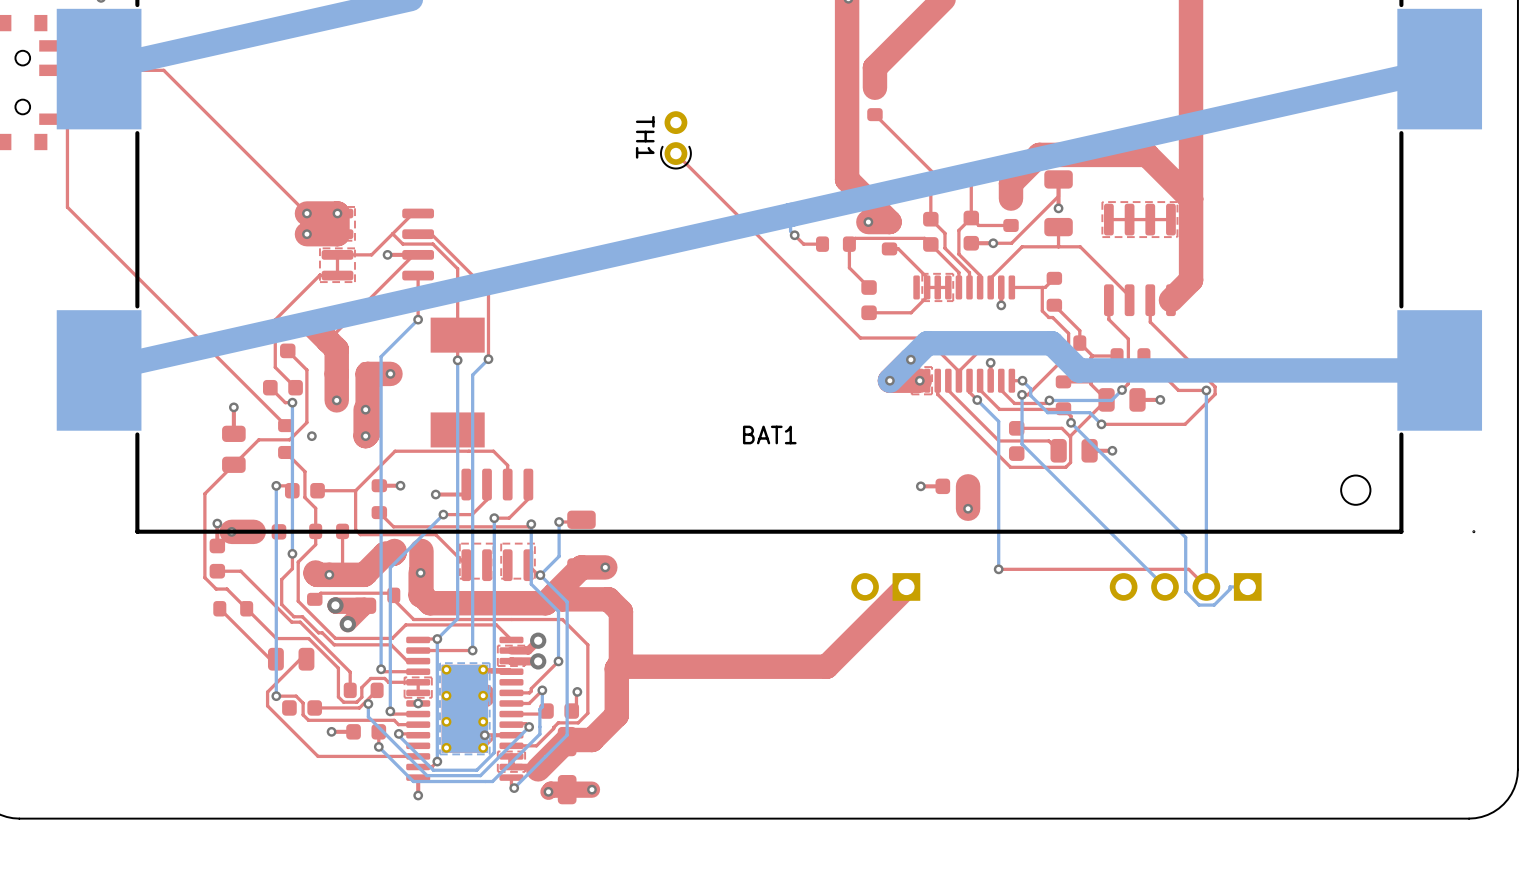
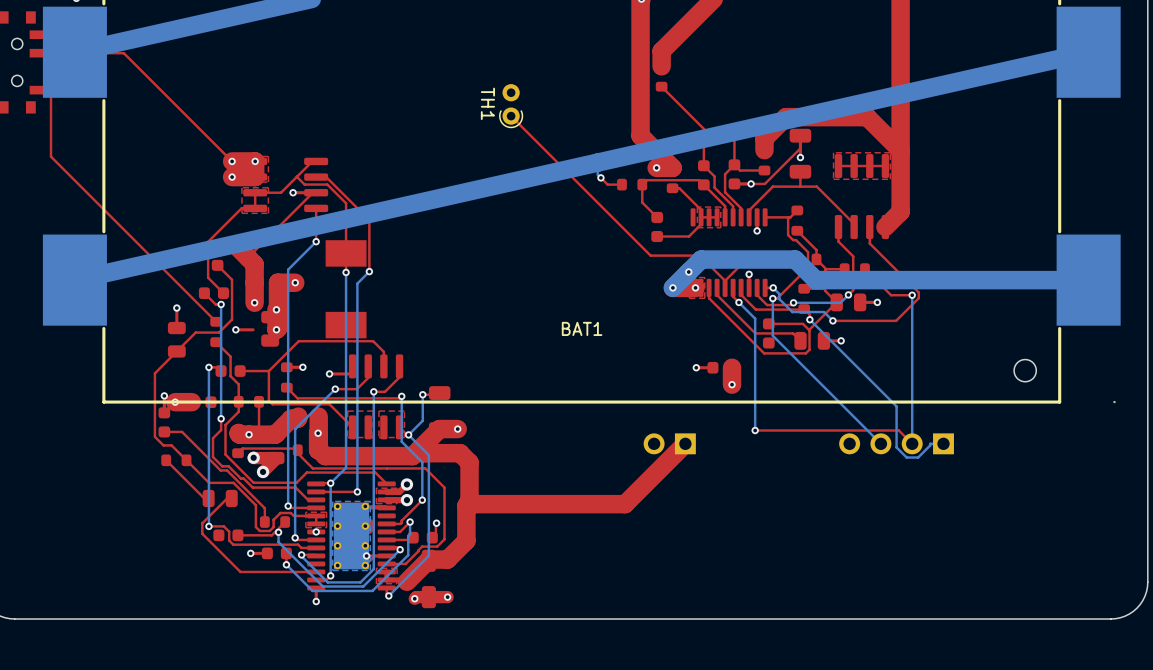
part: none -> (270, 328)
top track: none -> (253, 329) (235, 329)

